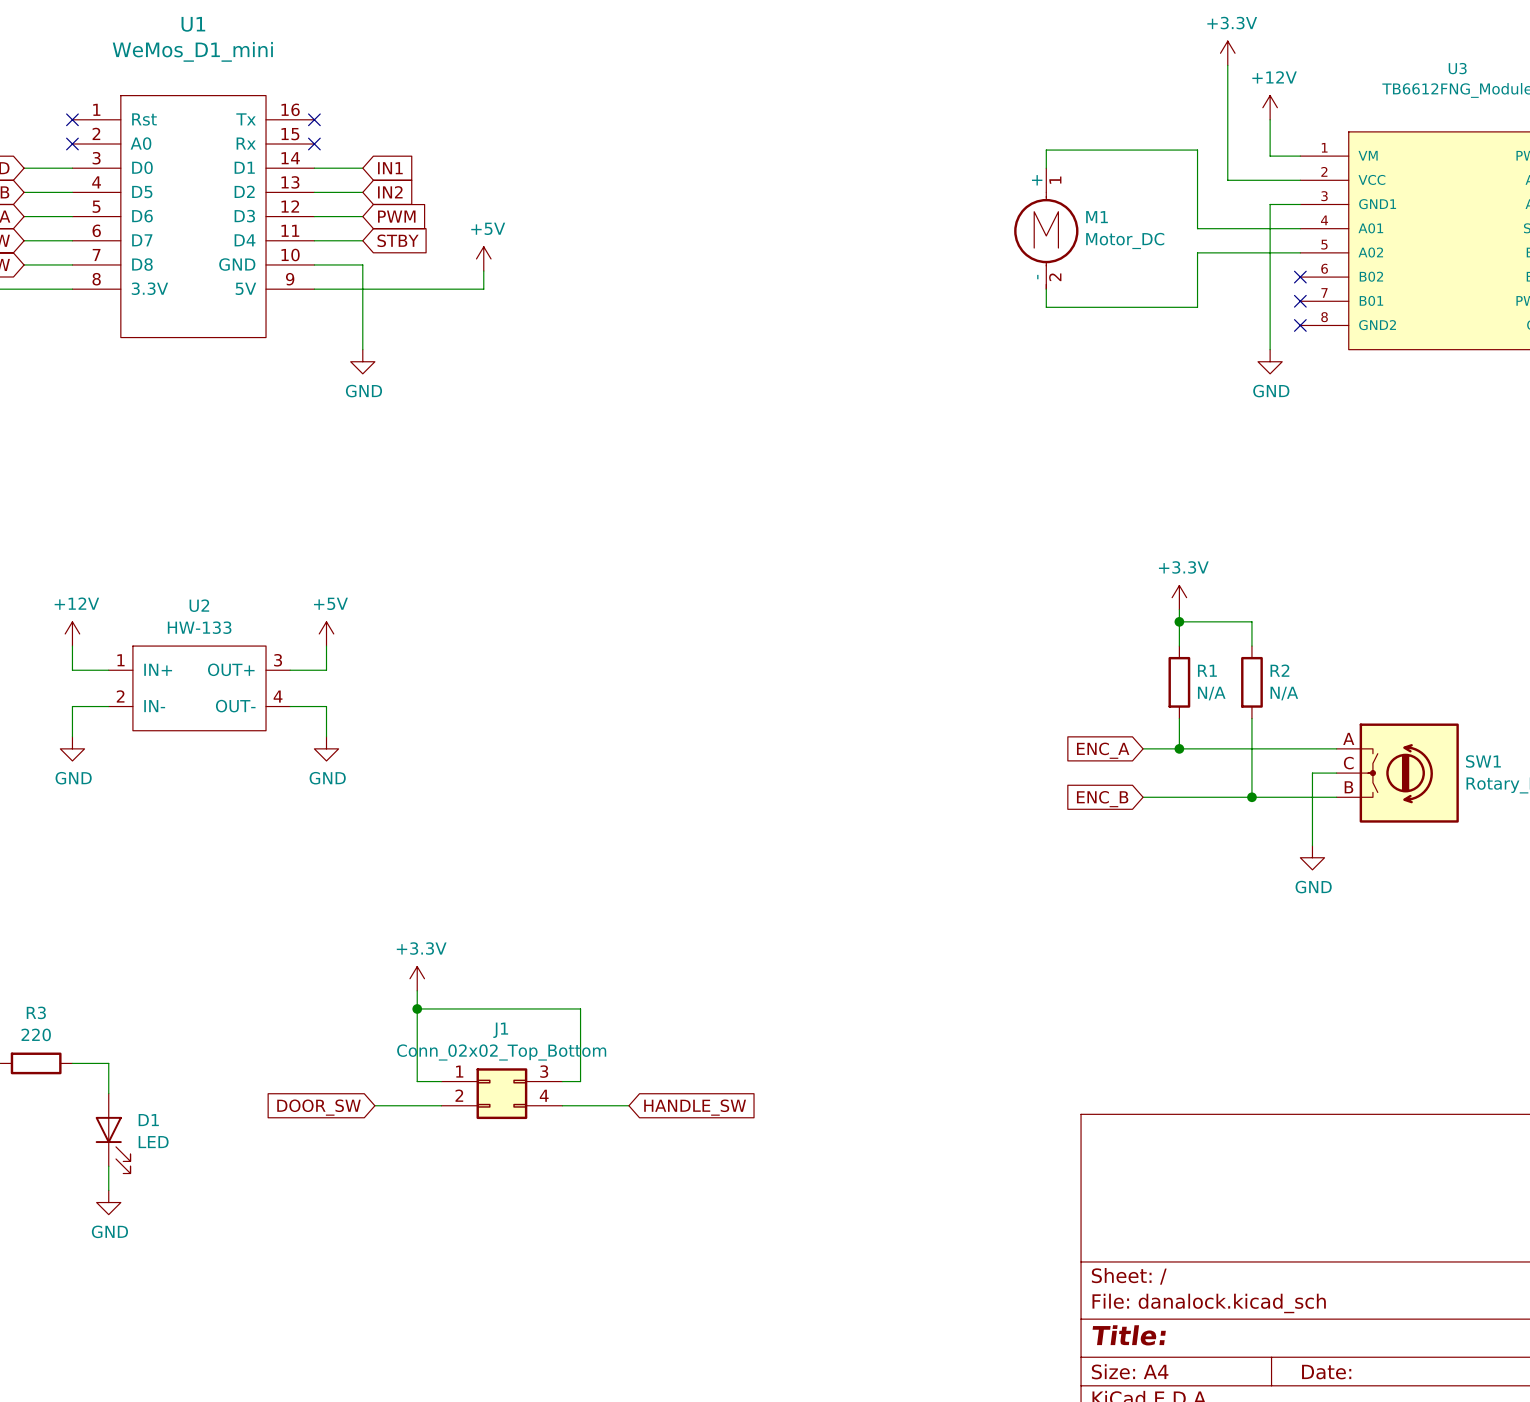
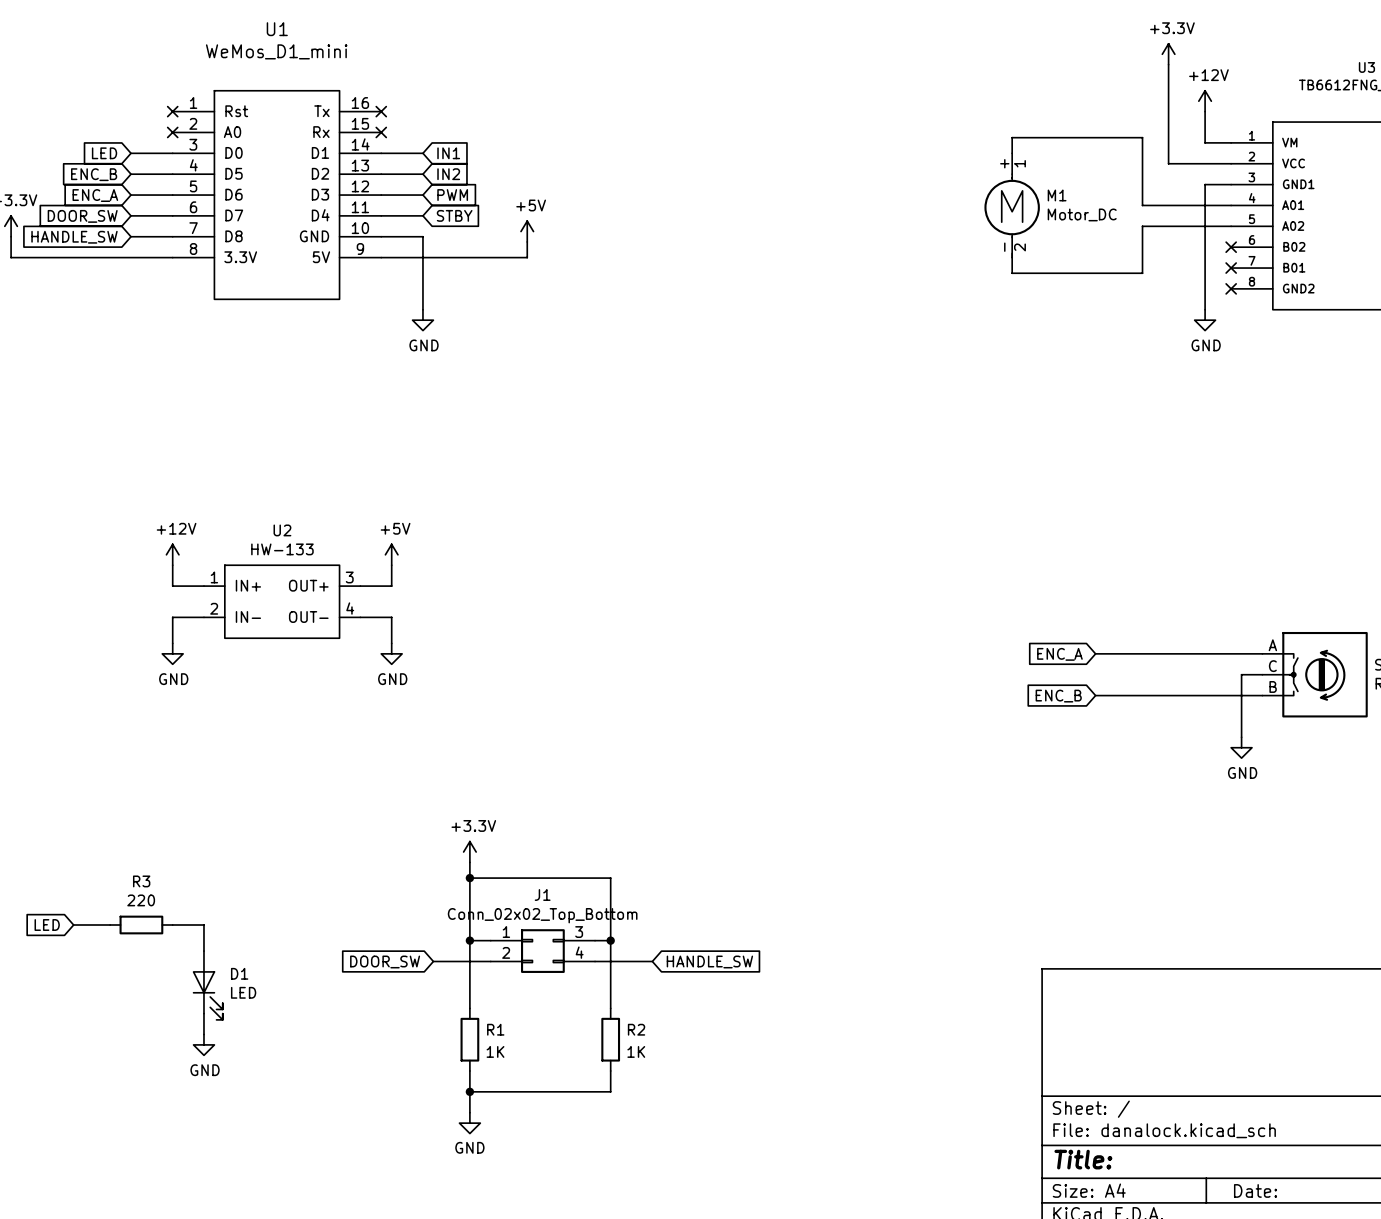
power symbol: +3.3V (1179, 597) -> none
wire: (1179, 609) (1179, 646) -> none
wire: (1179, 621) (1251, 621) (1251, 646) -> none
junction: (1179, 621) -> none
R1 position: (1179, 682) -> (469, 1039)
R2 position: (1251, 682) -> (610, 1039)
R1 value: N/A (1211, 693) -> 1K (495, 1051)
R2 value: N/A (1284, 693) -> 1K (636, 1051)
wire: (1179, 718) (1179, 748) -> none
wire: (1251, 718) (1251, 797) -> none
junction: (1179, 748) -> none
junction: (1251, 797) -> none
wire: none -> (469, 940) (469, 1008)
junction: none -> (469, 940)
wire: none -> (610, 940) (610, 1008)
junction: none -> (610, 940)
wire: none -> (469, 1070) (469, 1112)
wire: none -> (610, 1070) (610, 1091) (469, 1091)
junction: none -> (469, 1091)
power symbol: none -> GND (469, 1123)

